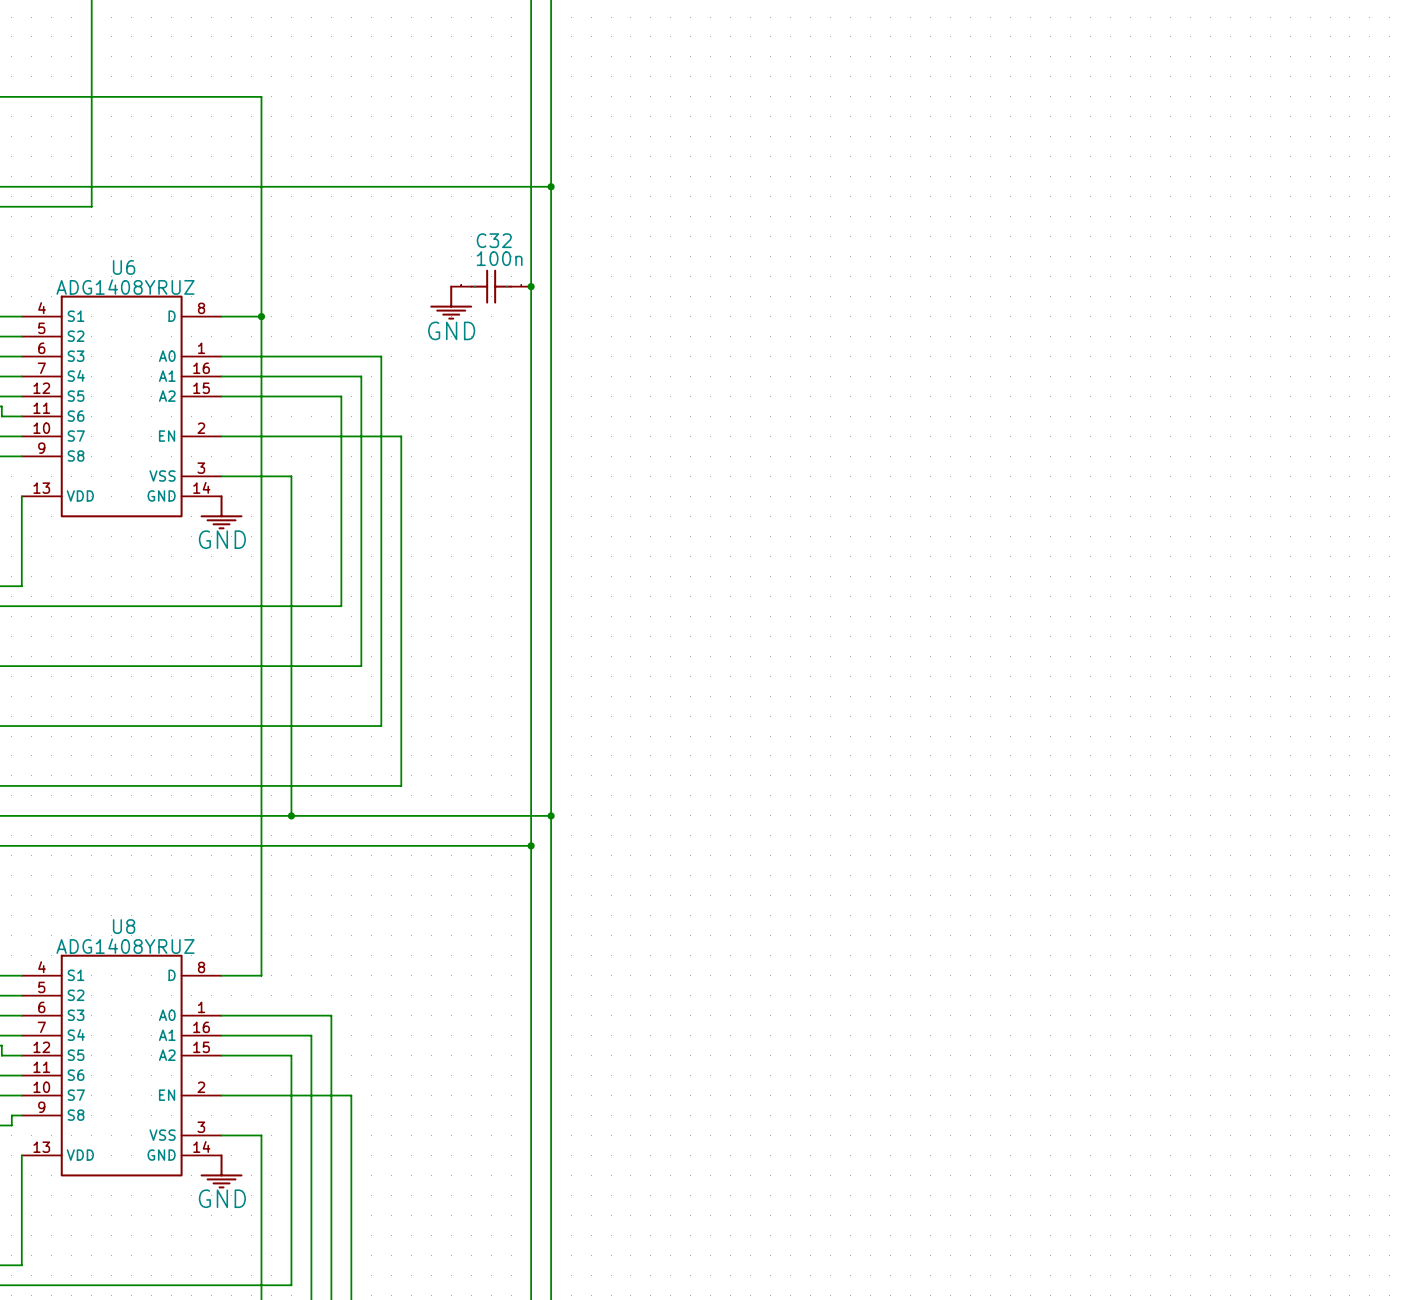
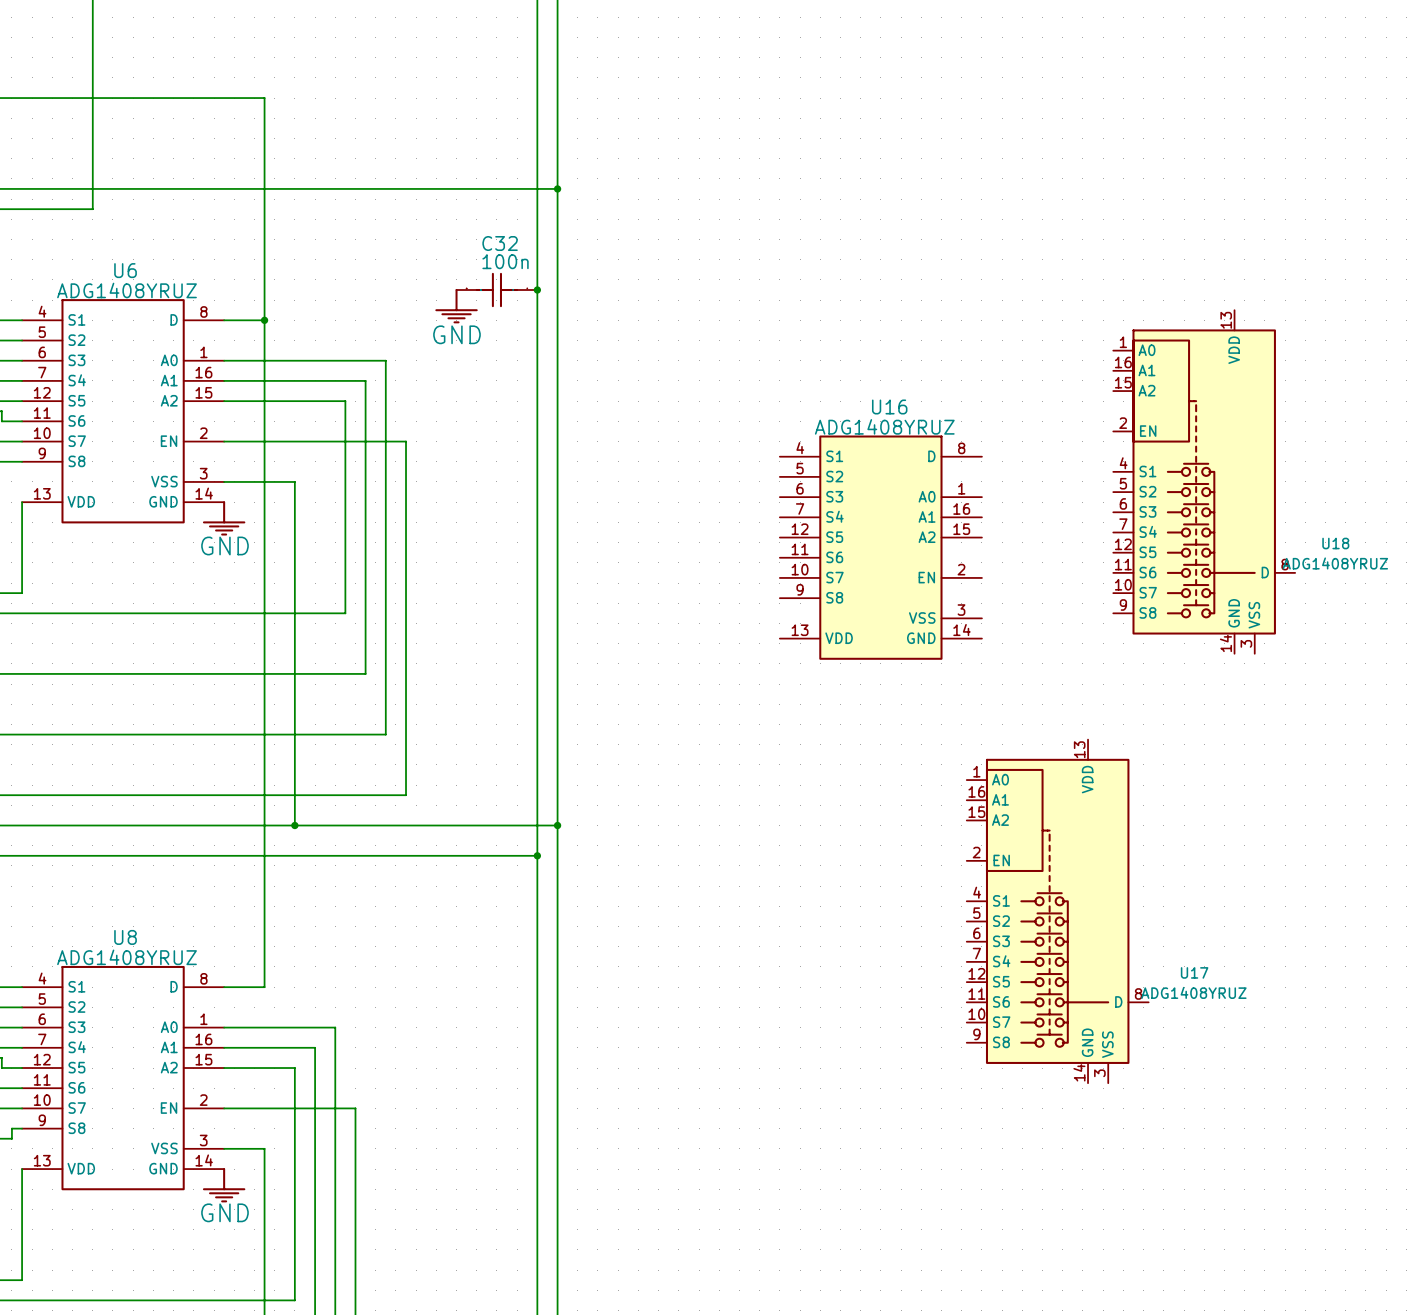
U18: none -> ADG1408YRUZ (1204, 481)
U16: none -> ADG1408YRUZ (880, 547)
U17: none -> ADG1408YRUZ (1057, 911)

